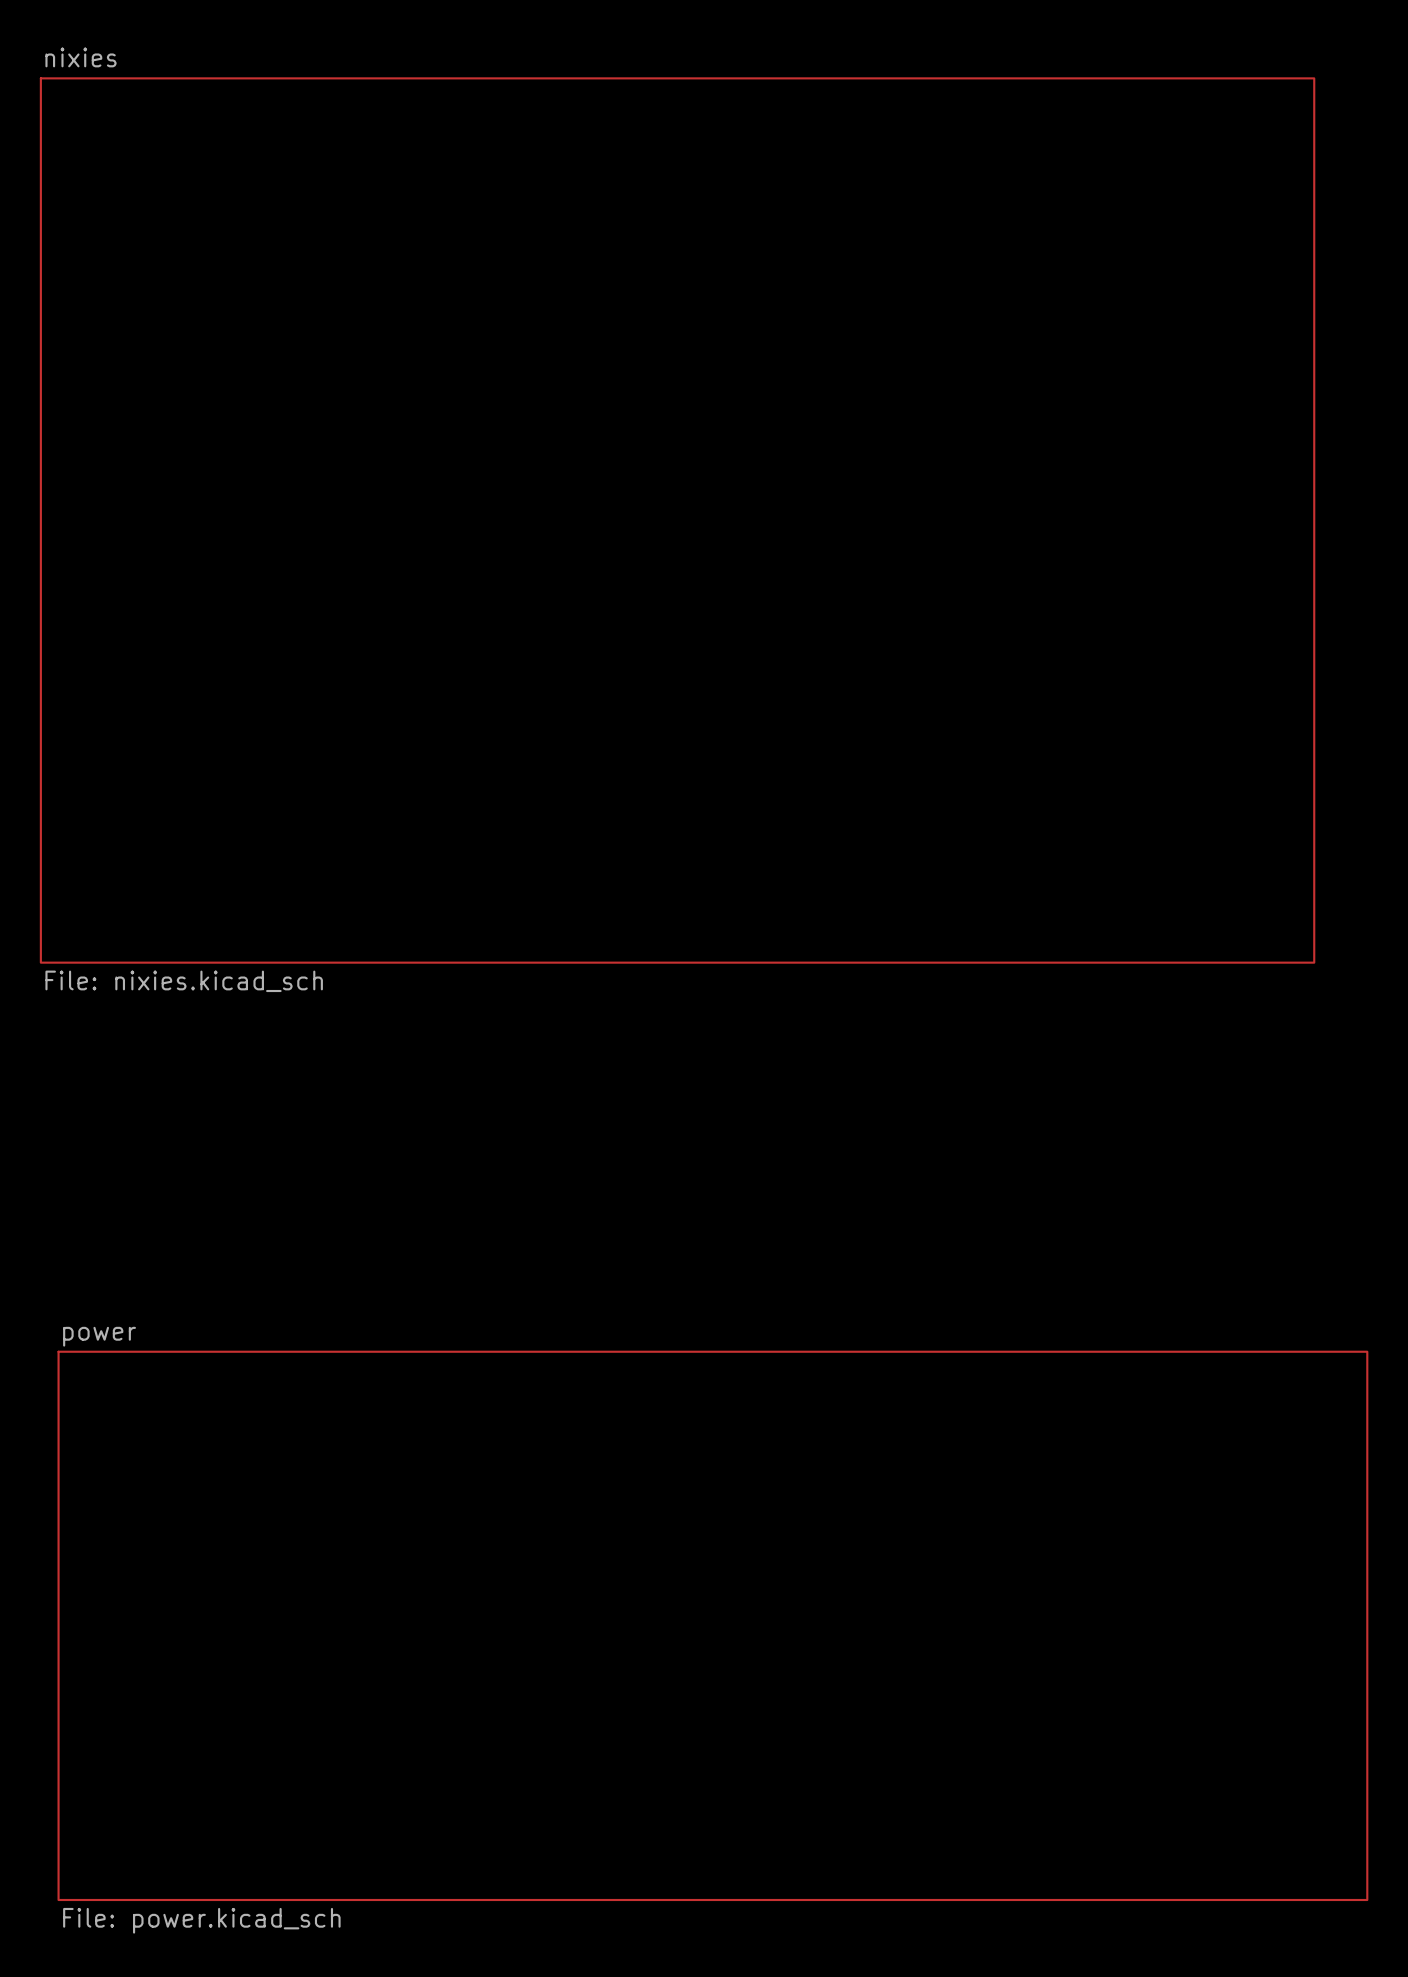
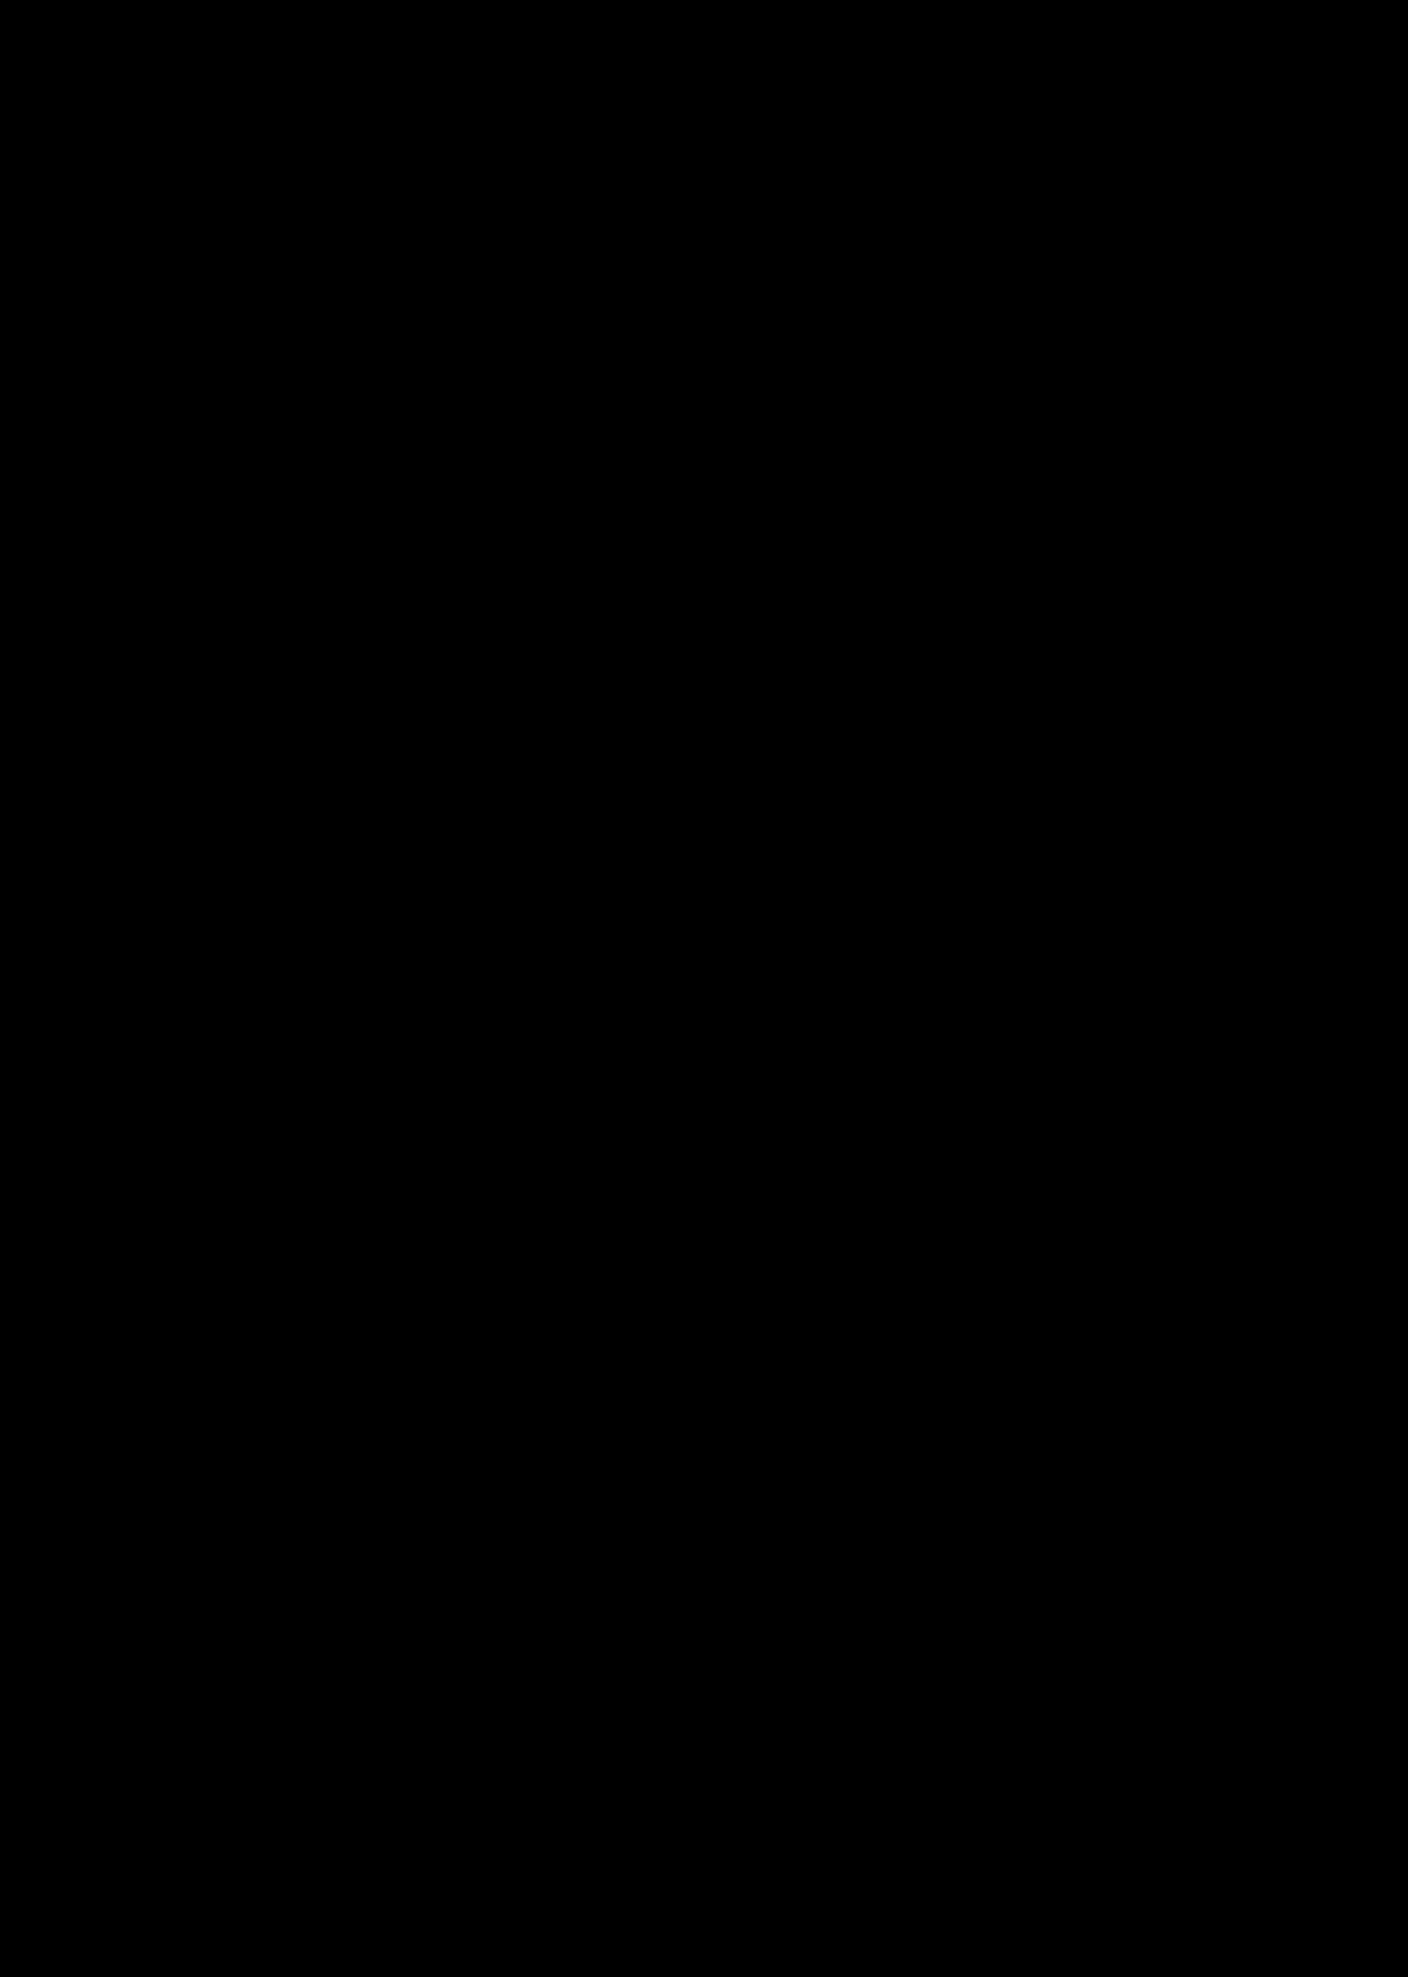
sheet nixies: File: nixies.kicad_sch (677, 520) -> none
sheet power: File: power.kicad_sch (712, 1625) -> none

